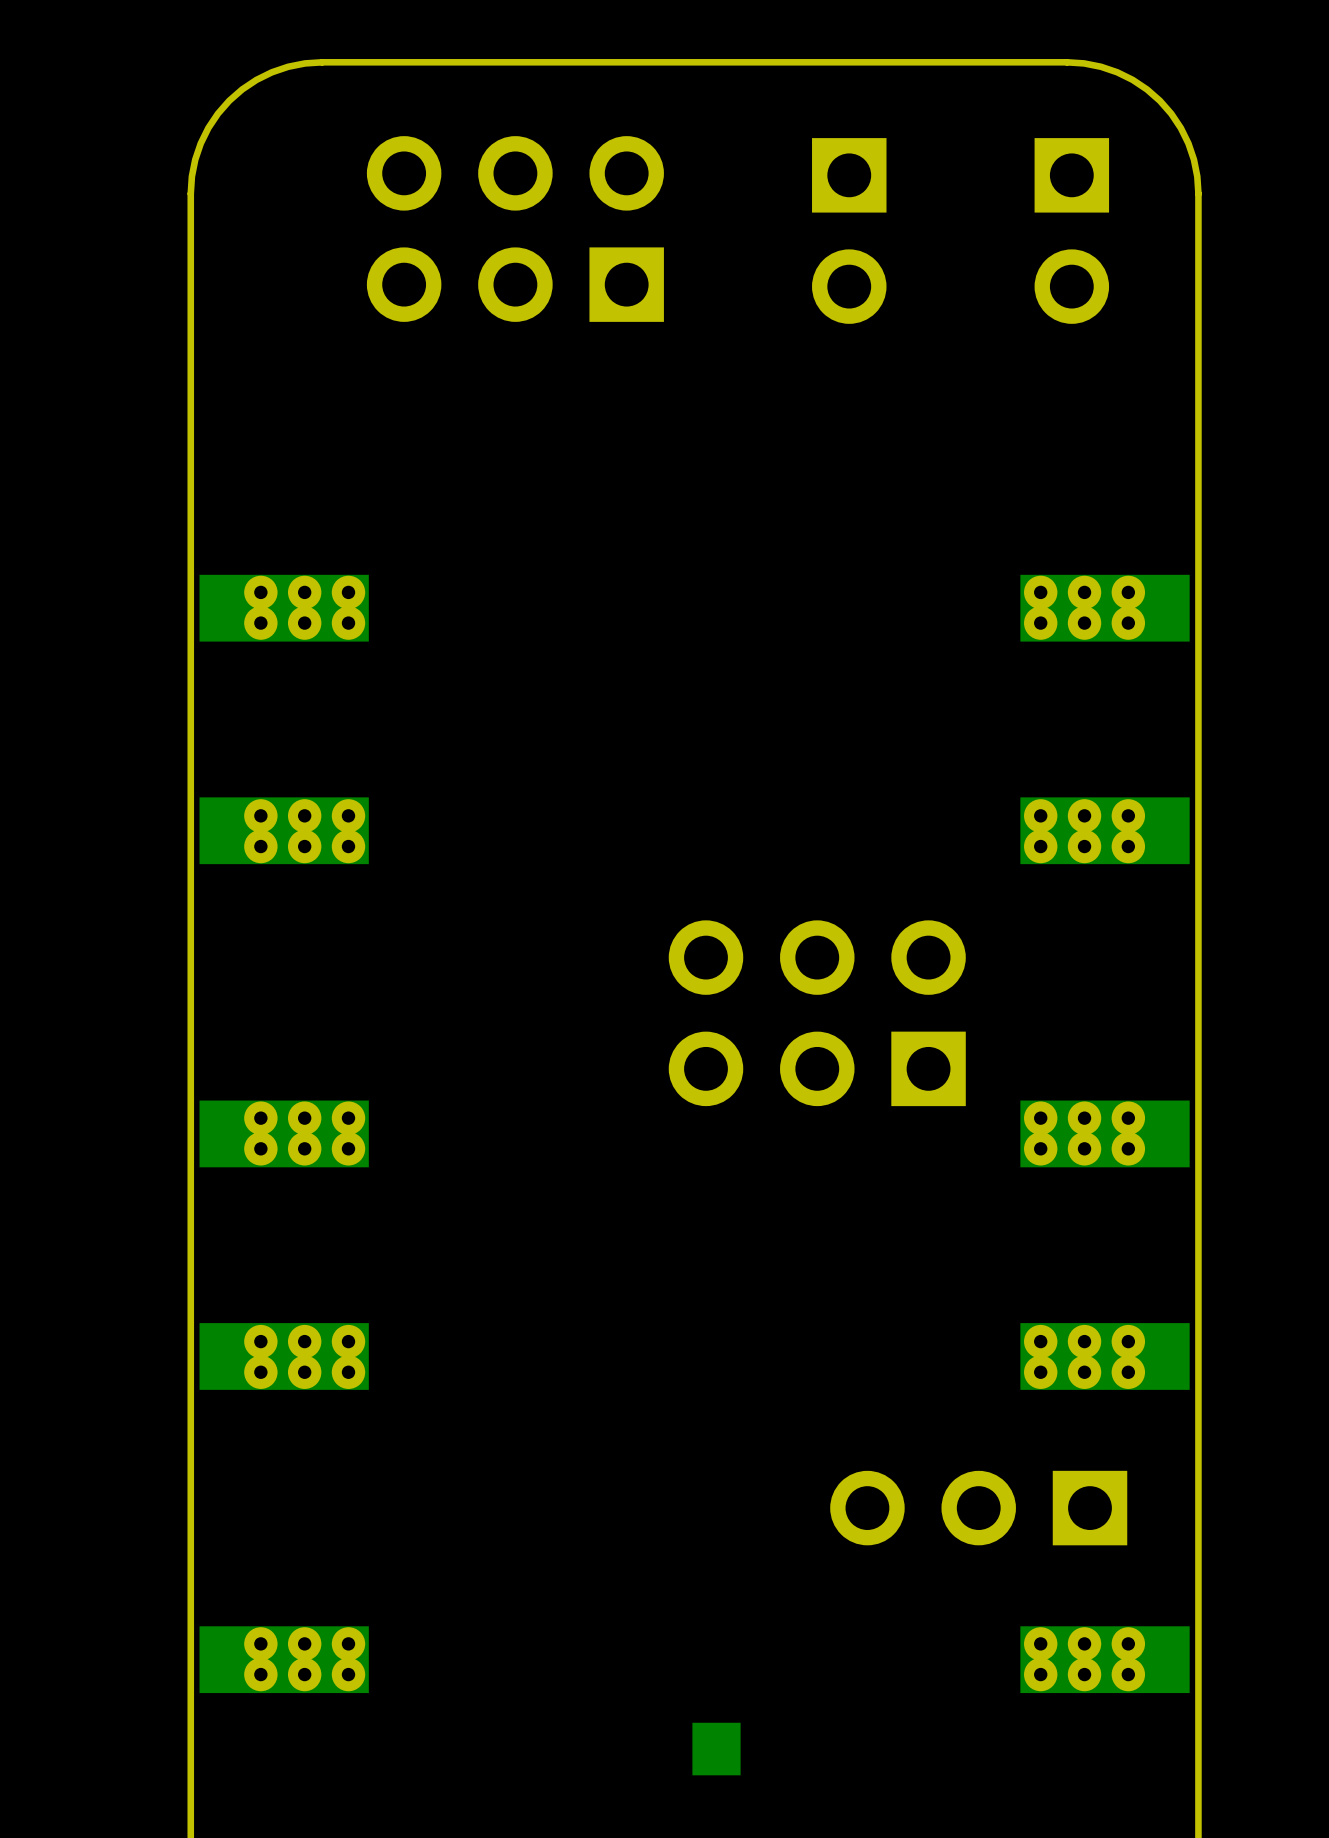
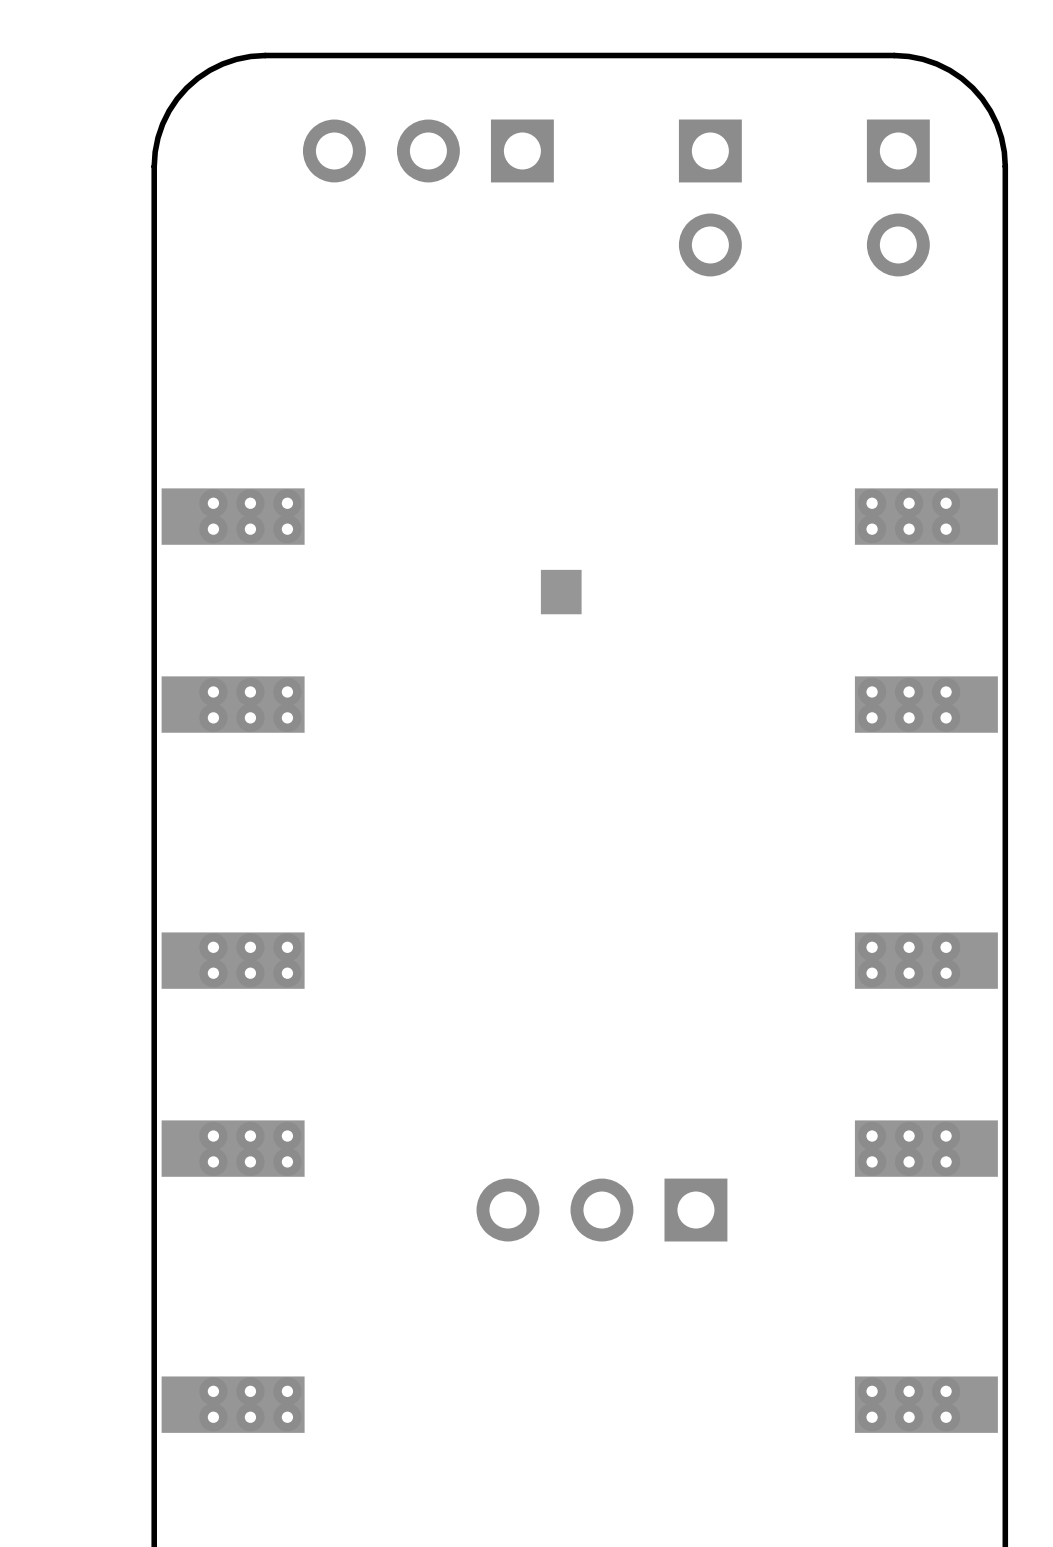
part: none -> (428, 150)
part: (515, 229) -> none
part: (817, 1013) -> none
part position: (978, 1508) -> (601, 1210)
part position: (716, 1749) -> (561, 592)

